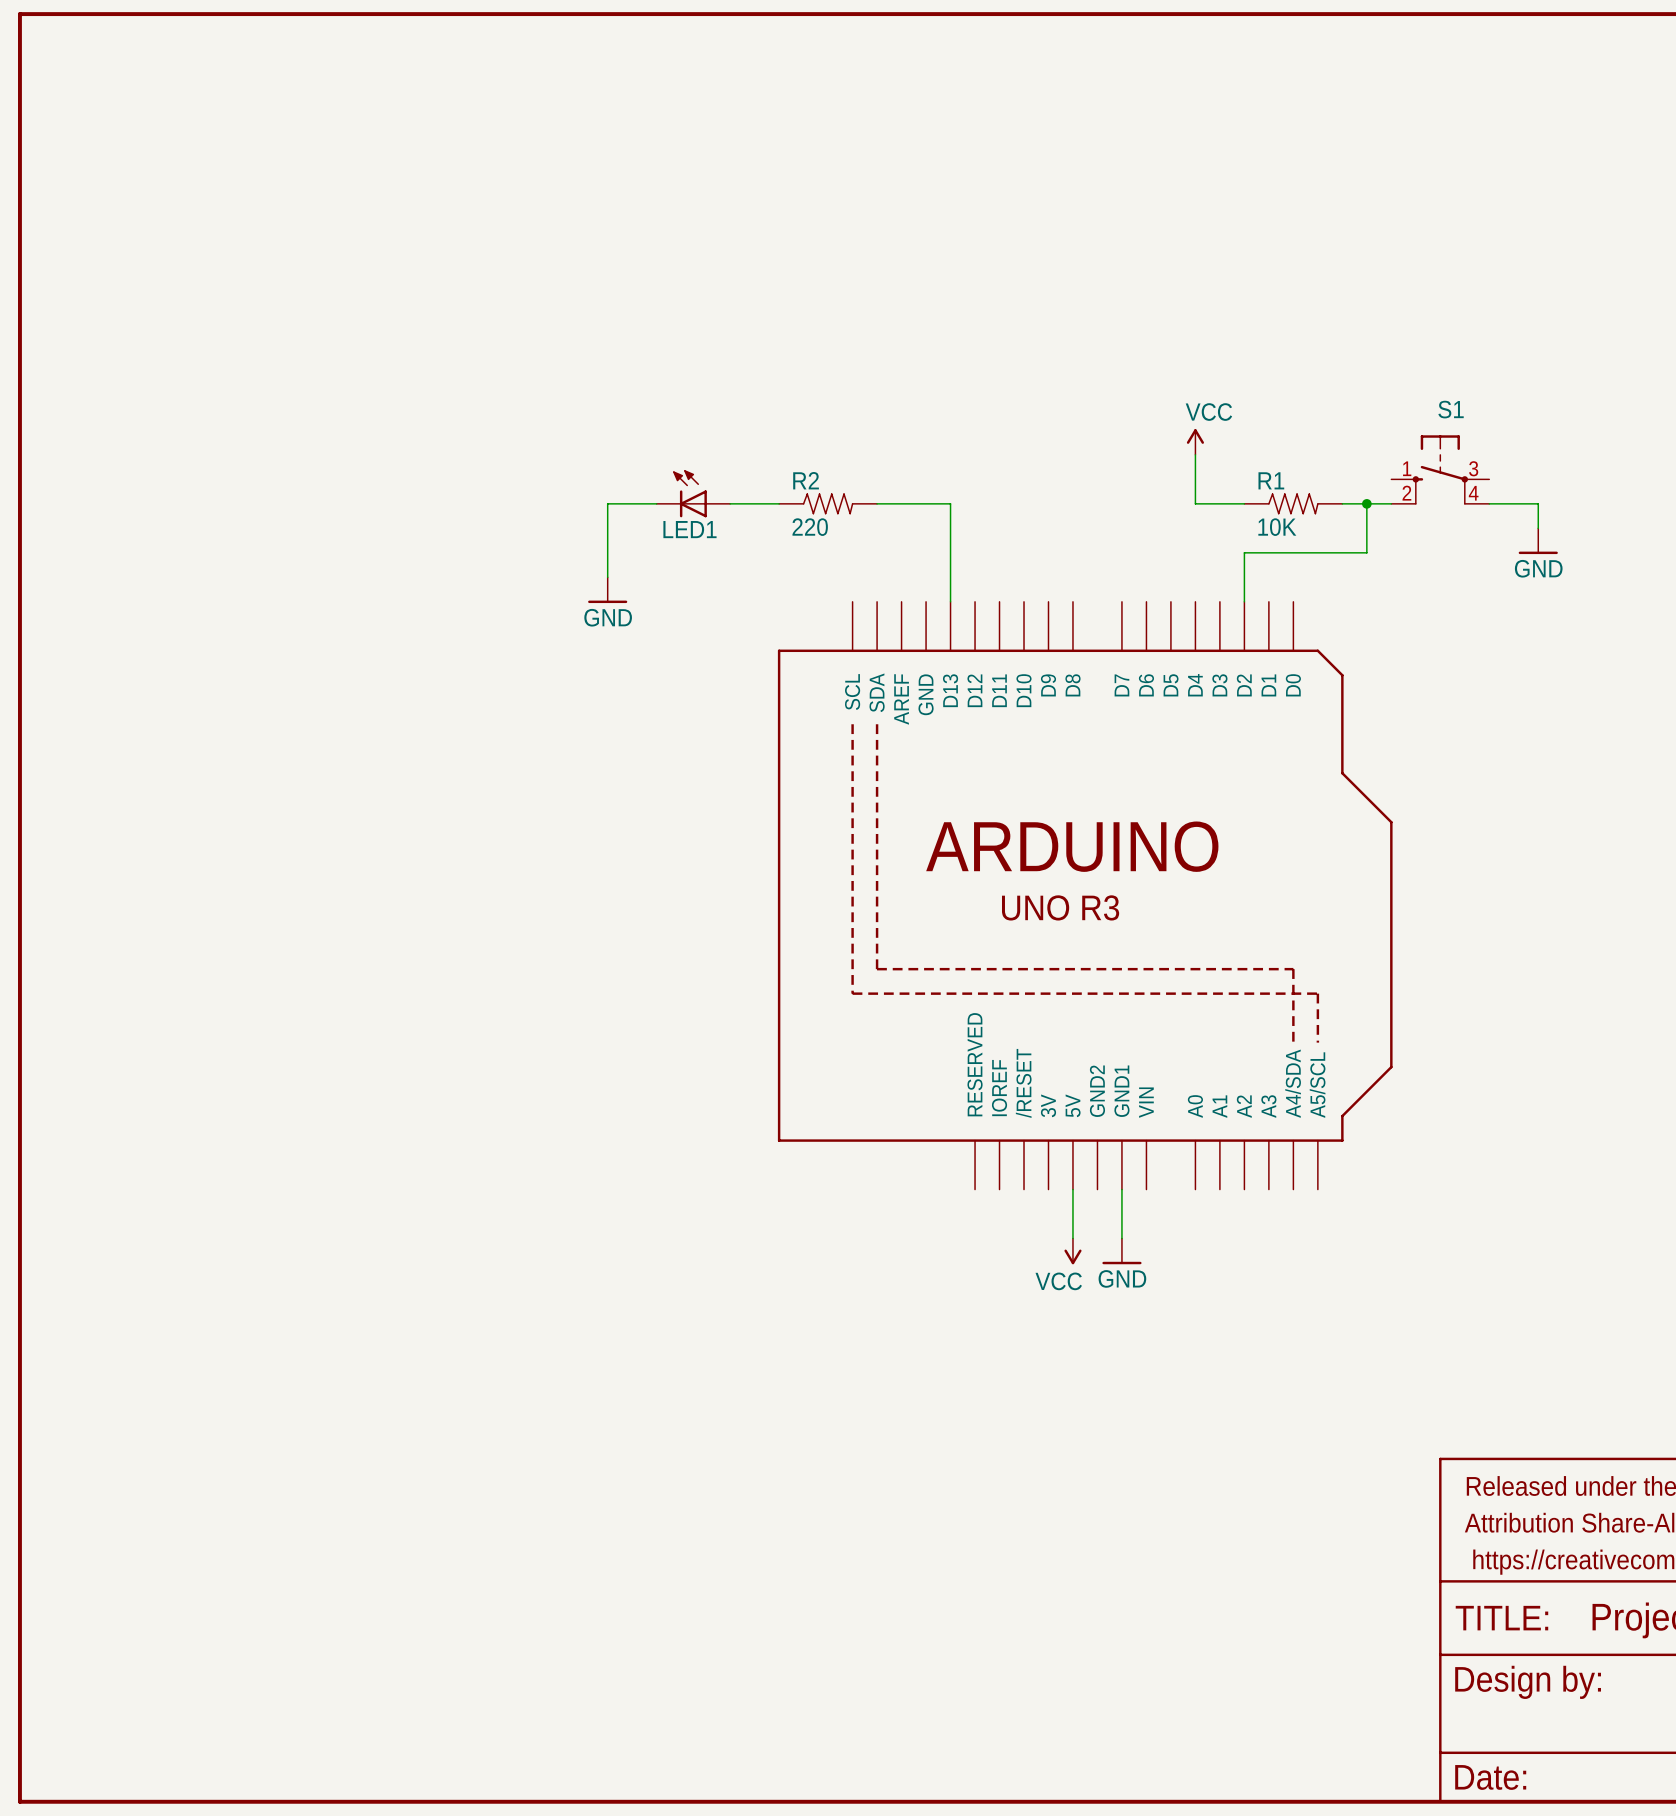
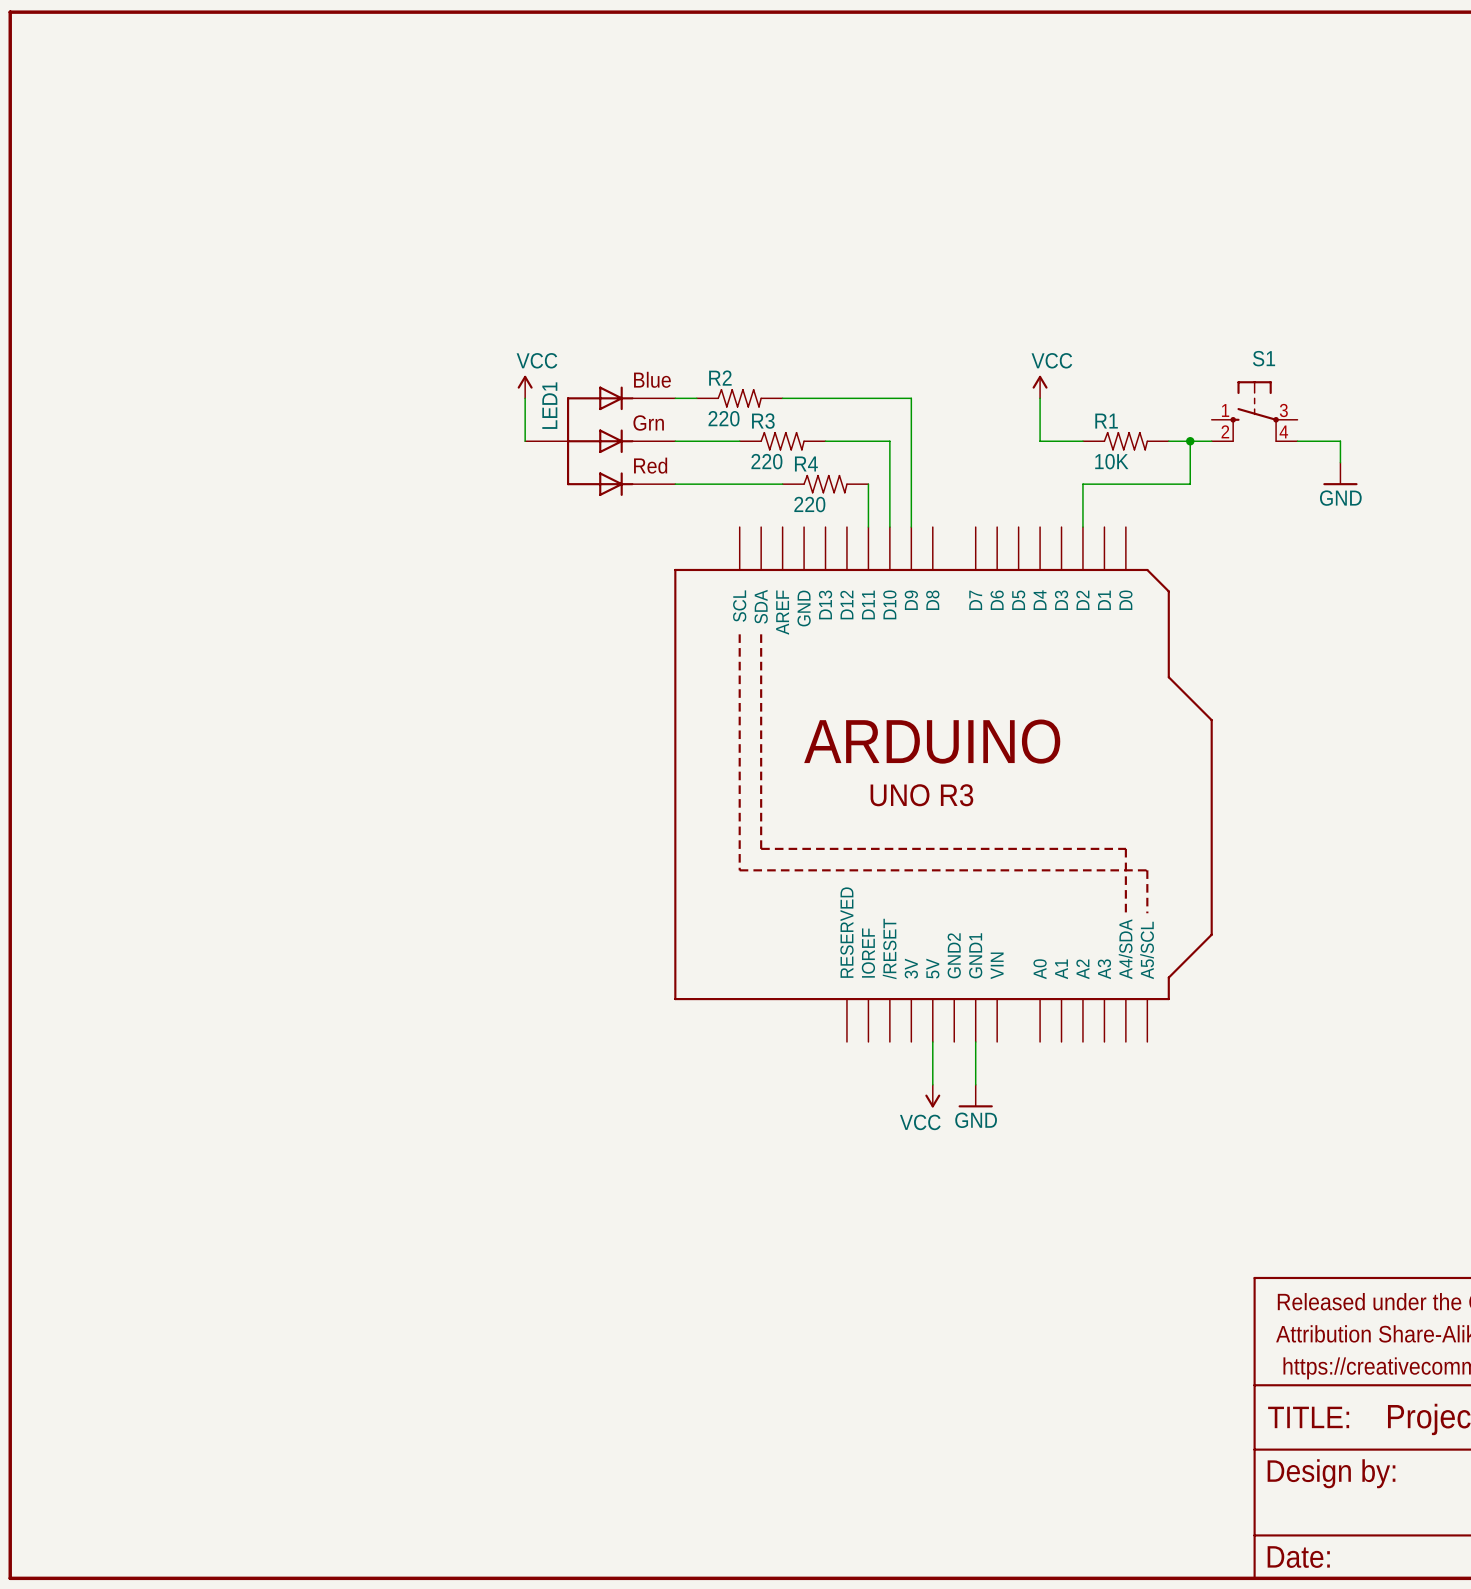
power symbol: none -> VCC (525, 387)
wire: none -> (525, 398) (525, 441)
wire: none -> (675, 398) (696, 398)
wire: none -> (782, 398) (911, 398) (911, 527)
LED1 symbol: [656, 470, 731, 518] -> [525, 386, 676, 496]
wire: (656, 503) (607, 503) (607, 577) -> none
R2 position: (828, 503) -> (739, 398)
wire: (877, 503) (950, 503) (950, 601) -> (825, 441) (889, 441) (889, 527)
R3: none -> 220 (782, 441)
LED1 name position: LED1 (689, 529) -> LED1 (549, 405)
wire: none -> (675, 484) (782, 484)
R4: none -> 220 (825, 484)
wire: none -> (868, 484) (868, 527)
power symbol: GND (607, 590) -> none

